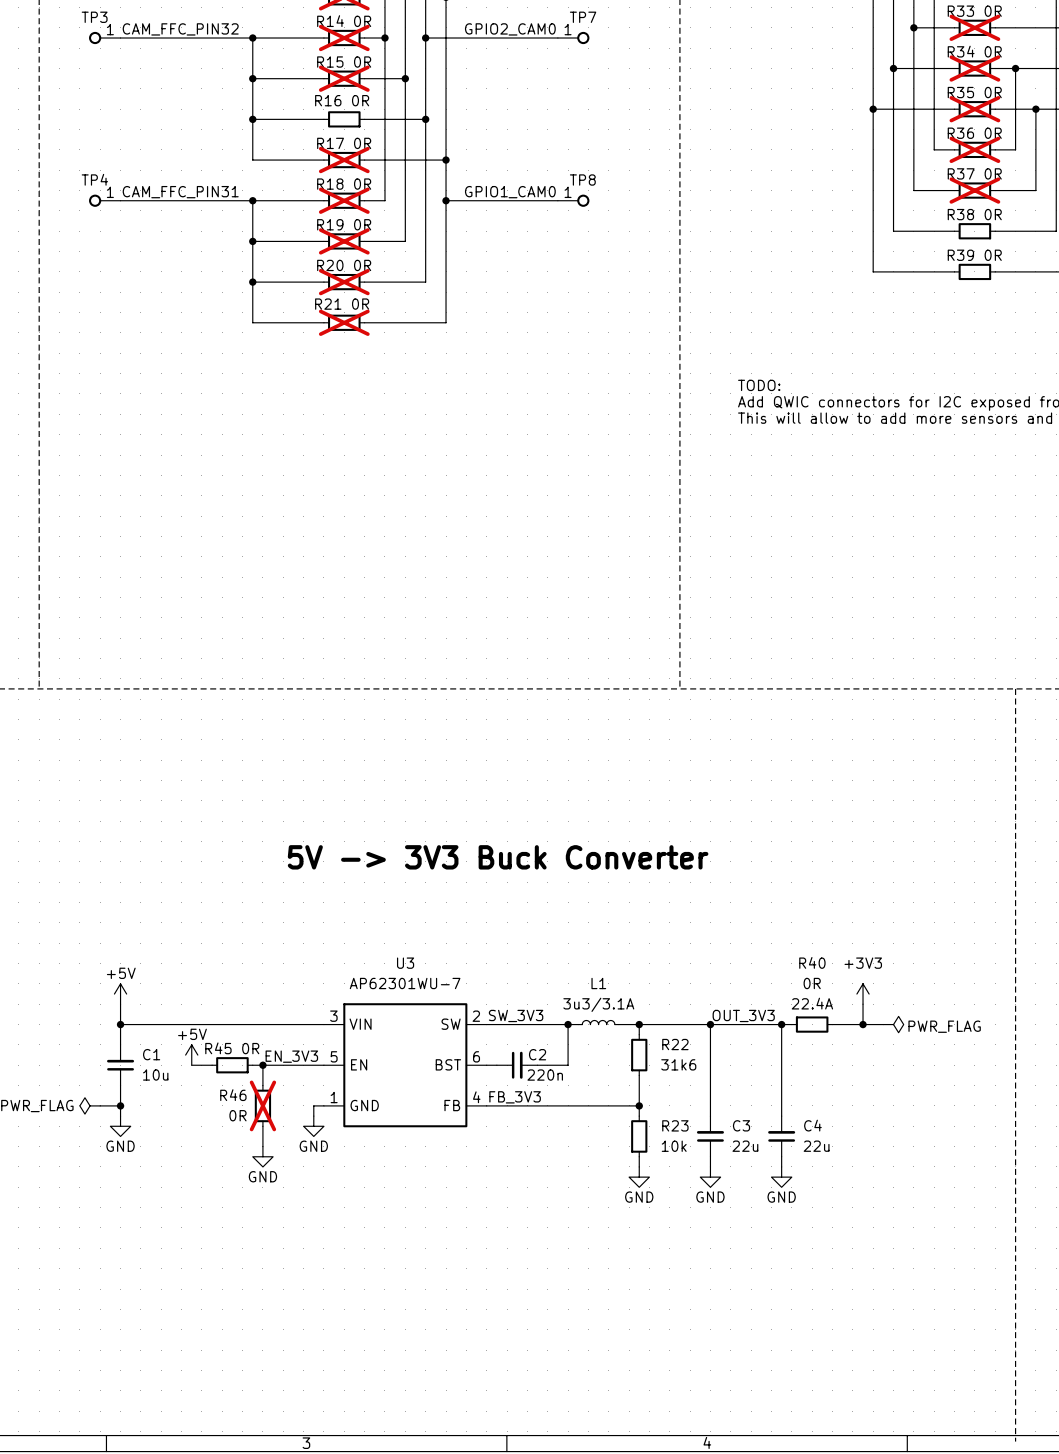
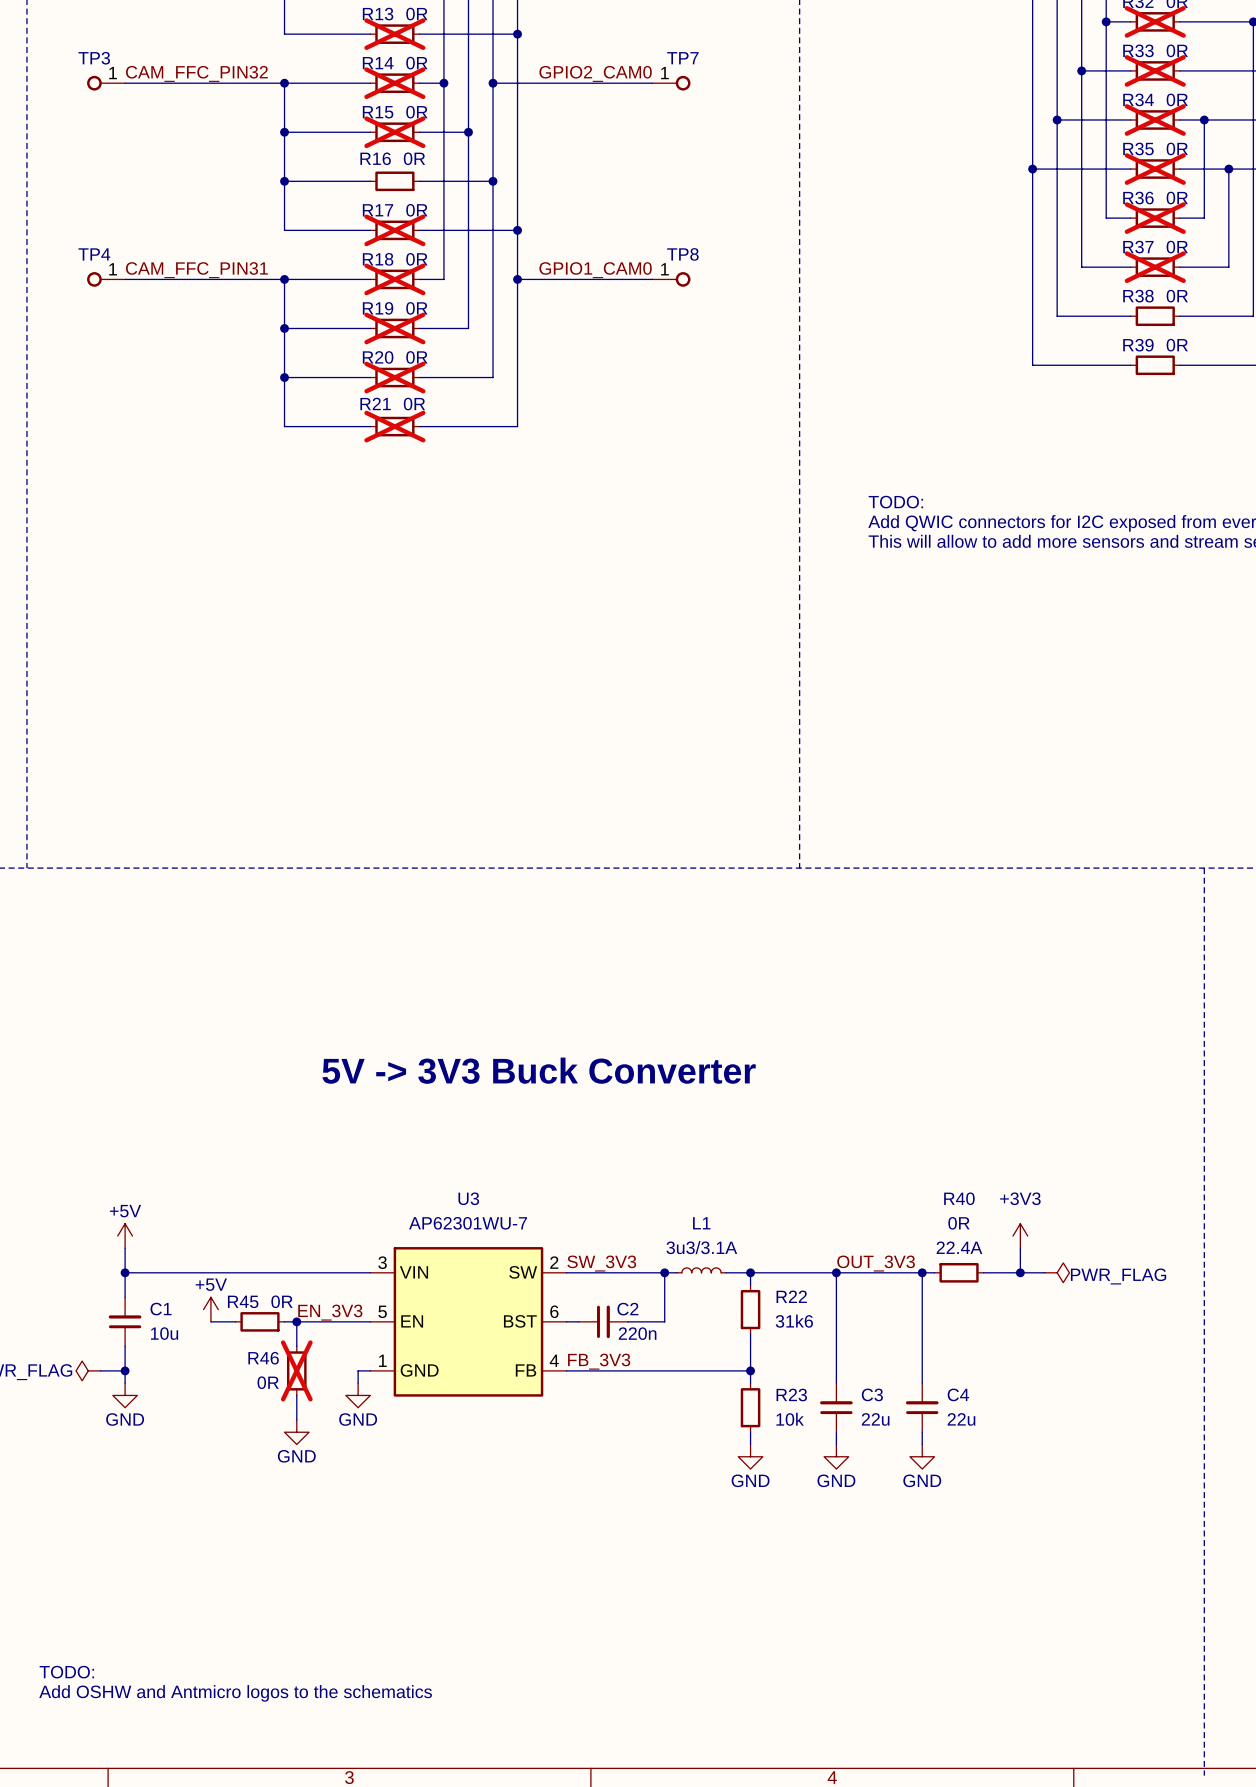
text: none -> TODO: (66, 1672)
text: none -> Add OSHW and Antmicro logos to the schematics (235, 1693)

